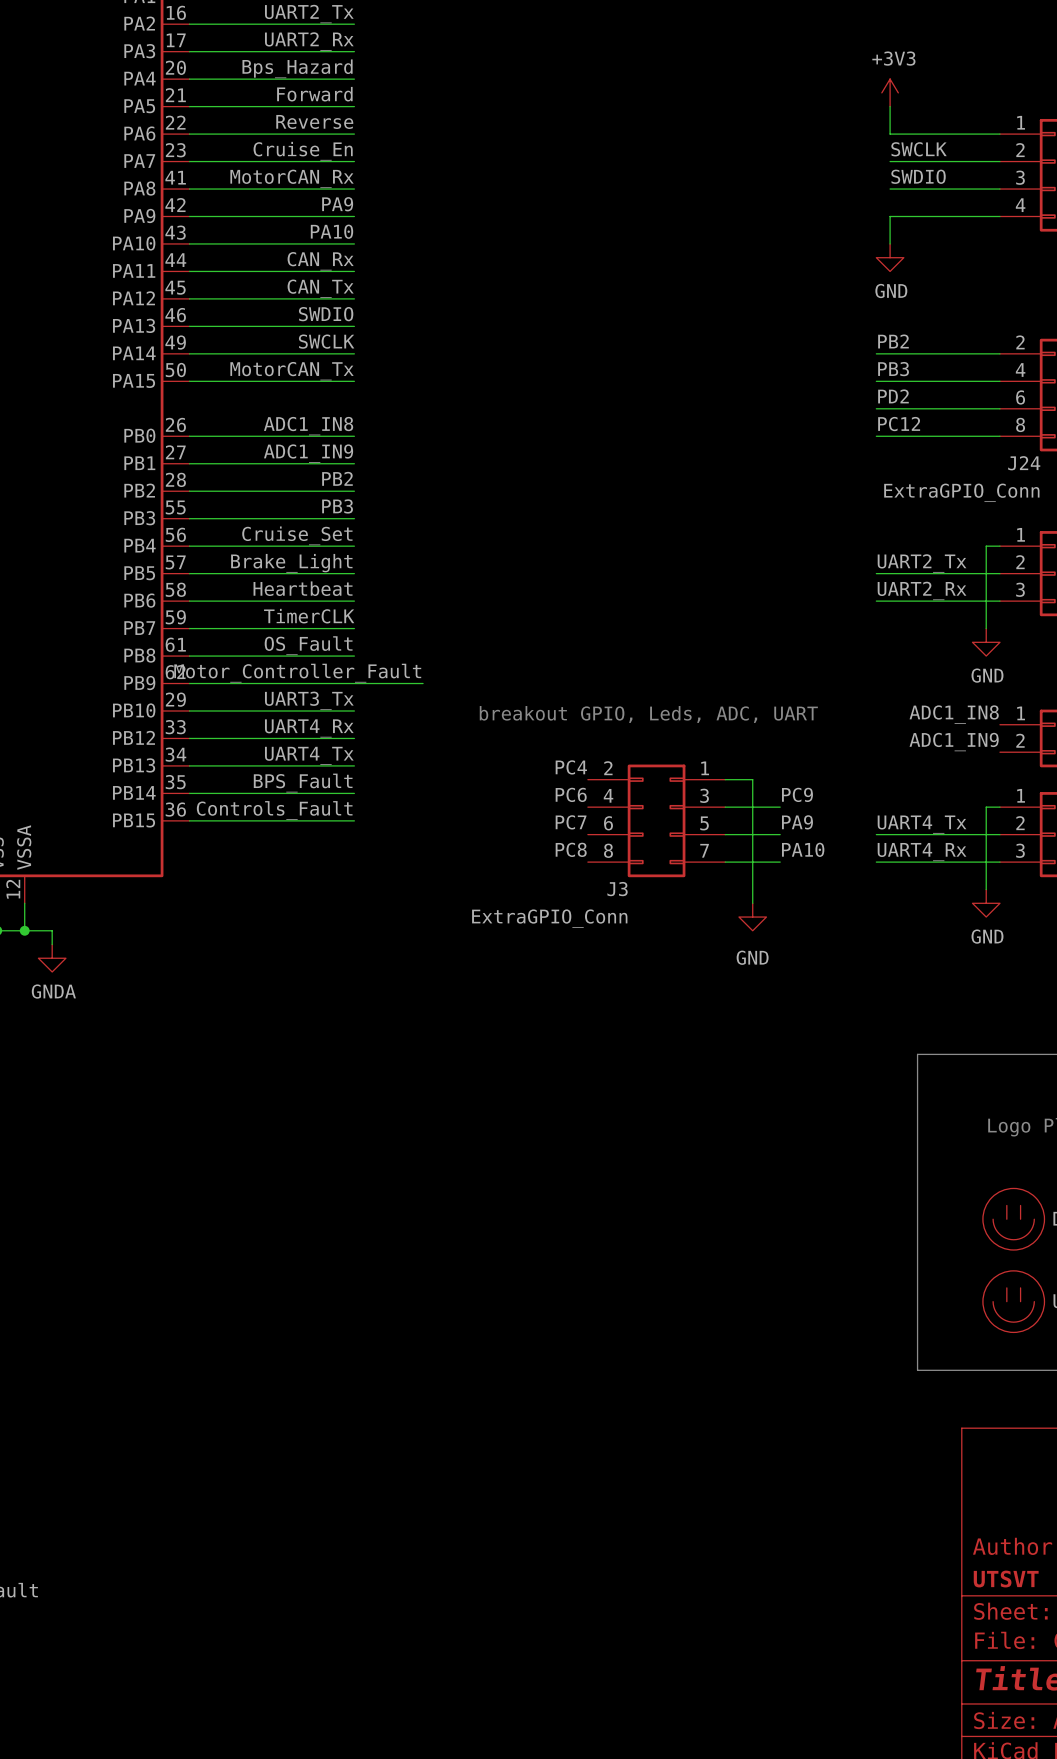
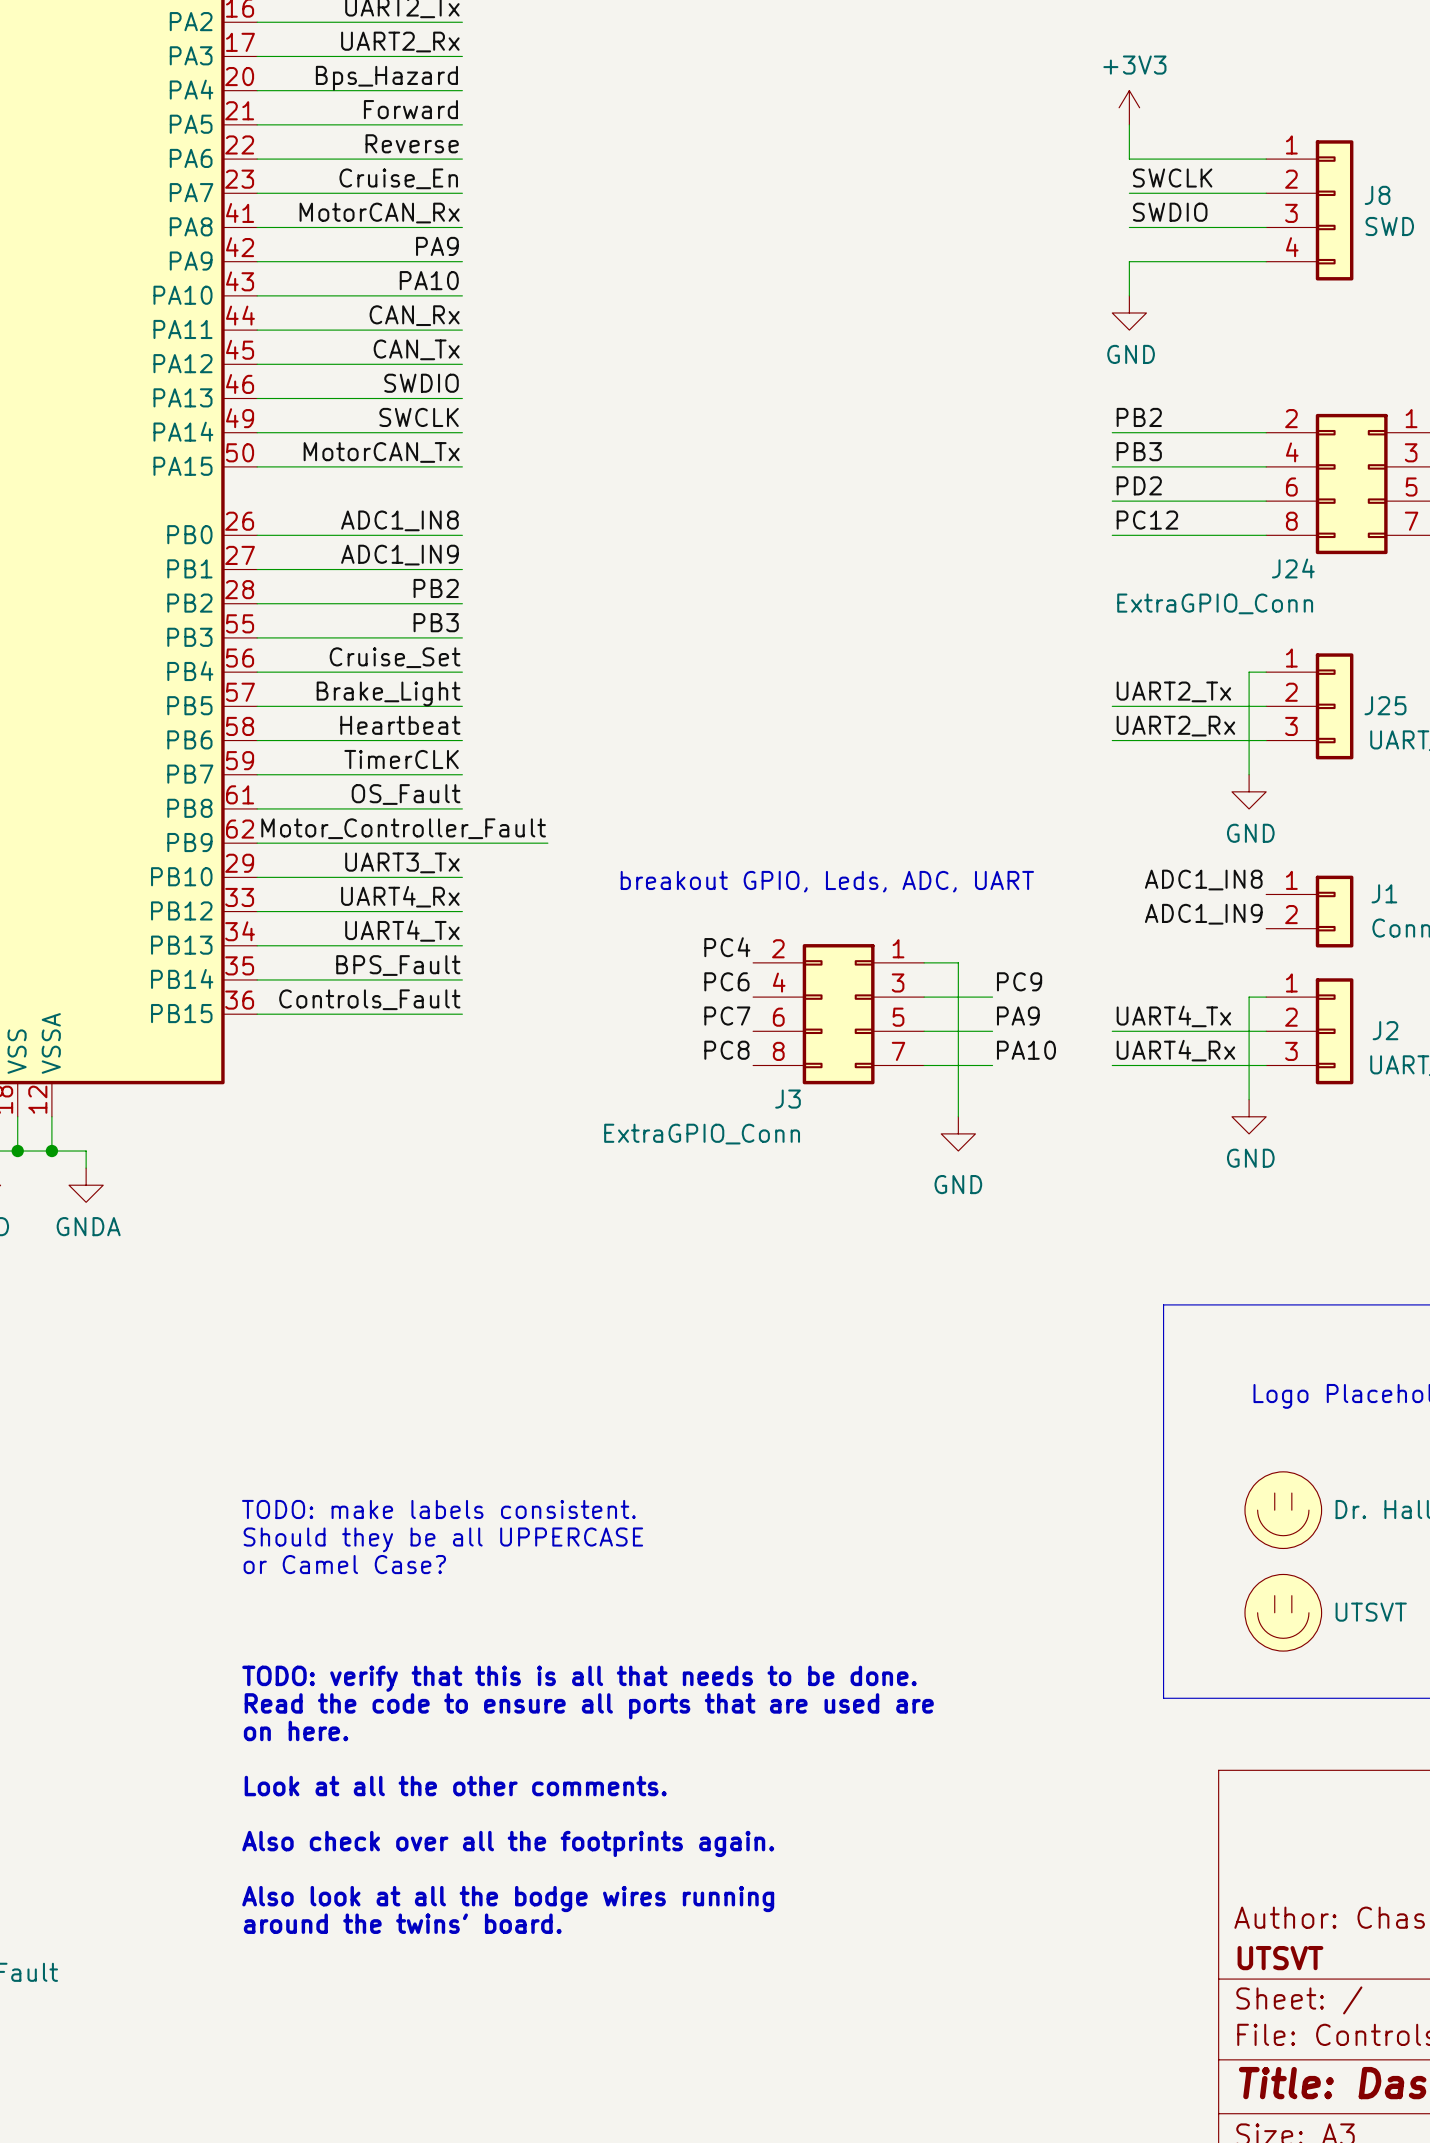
text: none -> TODO: make labels consistent. (438, 1509)
text: none -> Should they be all UPPERCASE (443, 1539)
text: none -> or Camel Case? (344, 1564)
text: none -> TODO: verify that this is all that needs to be done. (579, 1678)
text: none -> Read the code to ensure all ports that are used are (589, 1706)
text: none -> on here. (296, 1730)
text: none -> Look at all the other comments. (455, 1786)
text: none -> Also check over all the footprints again. (508, 1843)
text: none -> Also look at all the bodge wires running (508, 1899)
text: none -> around the twins' board. (402, 1923)

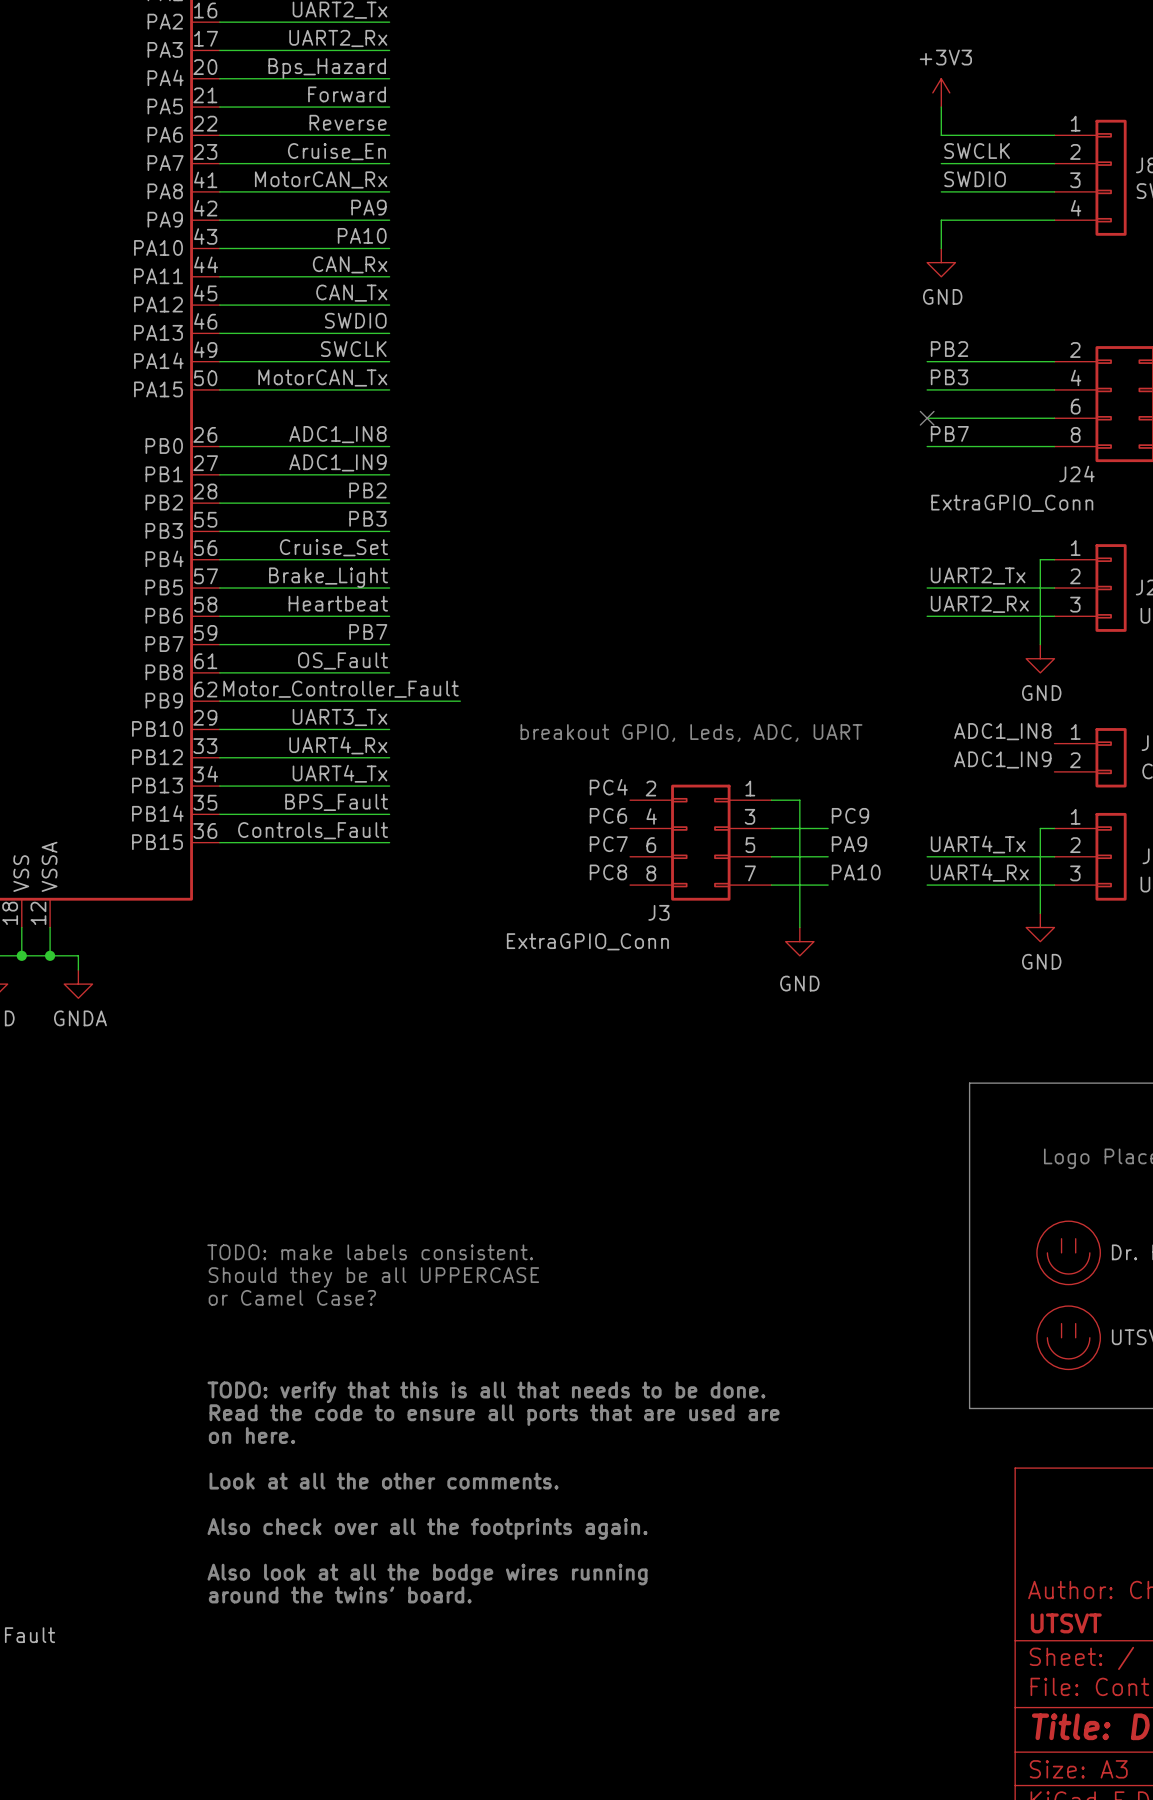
label: PD2 (1139, 485) -> none
no-connect mark: none -> (927, 418)
label: PC12 (1147, 520) -> PB7 (949, 433)
label: TimerCLK (401, 759) -> PB7 (368, 631)

